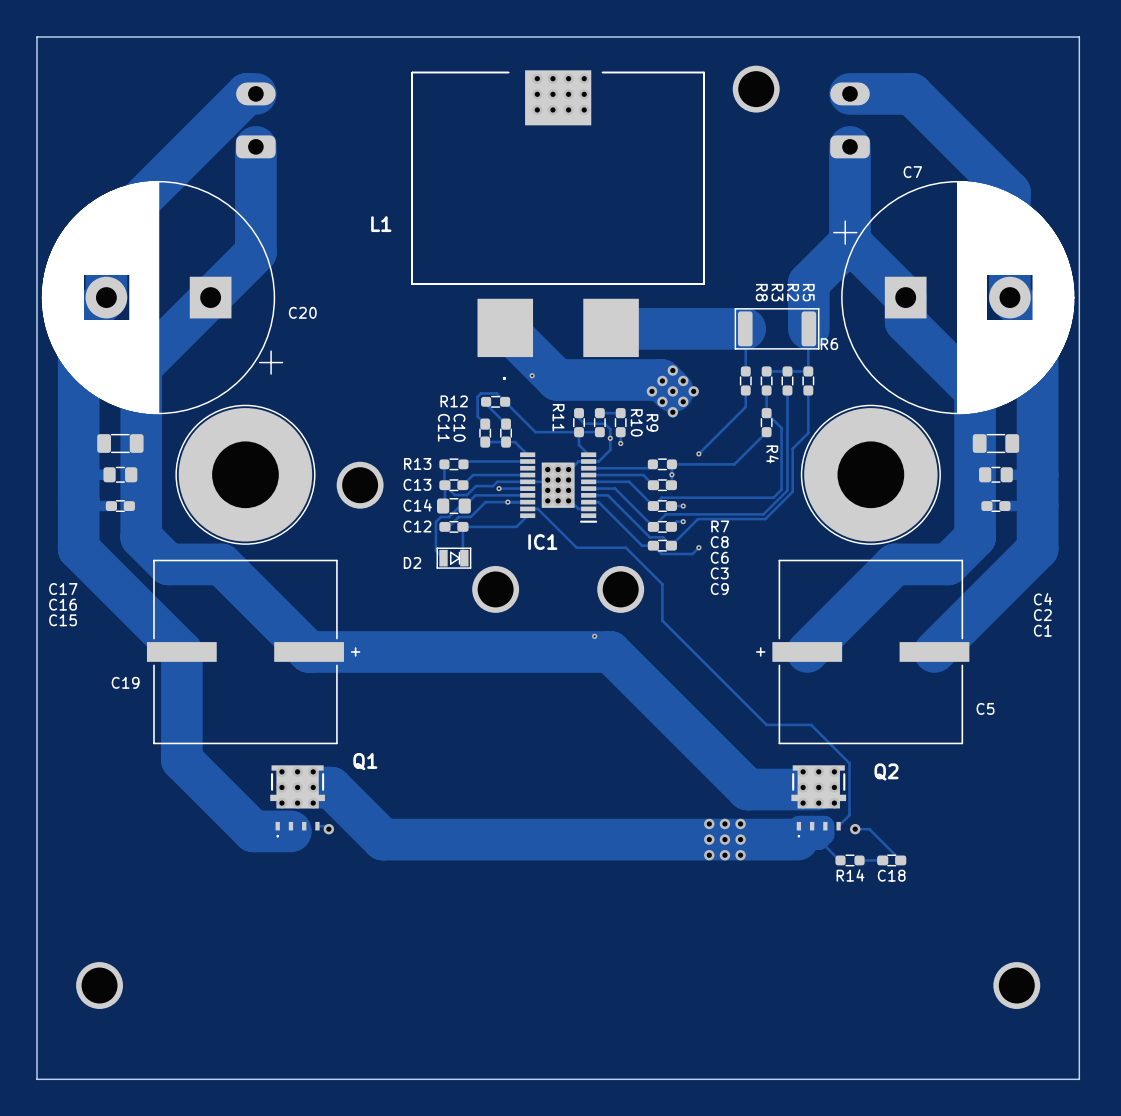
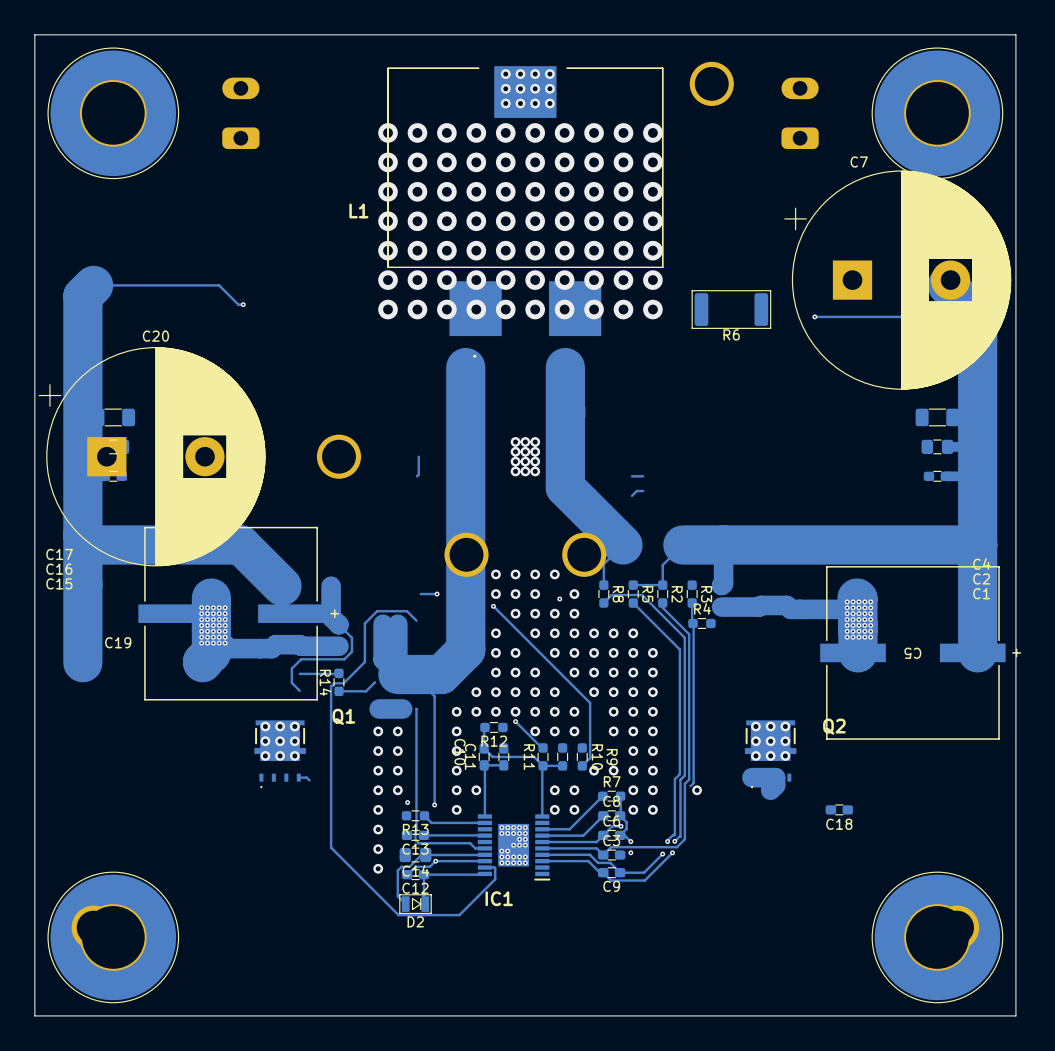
track: (255, 93) (246, 93) (106, 234) (106, 297) (78, 325) (78, 548) (181, 651) (181, 759) (253, 831) (290, 831) -> none
track: (850, 93) (911, 93) (1009, 192) (1009, 297) (1037, 325) (1037, 548) (934, 651) -> none
part: none -> (113, 113)
part: none -> (937, 113)
via: none -> (388, 132)
via: none -> (417, 132)
via: none -> (446, 132)
via: none -> (476, 132)
via: none -> (505, 132)
via: none -> (535, 132)
via: none -> (564, 132)
via: none -> (594, 132)
via: none -> (623, 132)
via: none -> (652, 132)
track: (255, 146) (255, 252) (141, 366) (141, 537) (168, 564) (221, 564) (309, 651) (610, 651) (747, 789) (818, 789) -> none
track: (850, 146) (850, 241) -> none
via: none -> (388, 162)
via: none -> (417, 162)
via: none -> (446, 162)
via: none -> (476, 162)
via: none -> (505, 162)
via: none -> (535, 162)
via: none -> (564, 162)
via: none -> (594, 162)
via: none -> (623, 162)
via: none -> (652, 162)
via: none -> (388, 191)
via: none -> (417, 191)
via: none -> (446, 191)
via: none -> (476, 191)
via: none -> (505, 191)
via: none -> (535, 191)
via: none -> (564, 191)
via: none -> (594, 191)
via: none -> (623, 191)
via: none -> (652, 191)
via: none -> (388, 221)
via: none -> (417, 221)
via: none -> (446, 221)
via: none -> (476, 221)
via: none -> (505, 221)
via: none -> (535, 221)
via: none -> (564, 221)
via: none -> (594, 221)
via: none -> (623, 221)
via: none -> (652, 221)
track: (850, 241) (905, 297) (905, 321) (975, 391) (975, 537) (947, 564) (894, 564) (807, 651) -> none
track: (850, 241) (808, 283) (808, 371) (766, 371) -> none
via: none -> (388, 250)
via: none -> (417, 250)
via: none -> (446, 250)
via: none -> (476, 250)
via: none -> (505, 250)
via: none -> (535, 250)
via: none -> (564, 250)
via: none -> (594, 250)
via: none -> (623, 250)
via: none -> (652, 250)
R8 name position: R8 (761, 292) -> R8 (618, 594)
R3 name position: R3 (777, 292) -> R3 (706, 594)
R2 name position: R2 (793, 292) -> R2 (677, 594)
R5 name position: R5 (808, 292) -> R5 (647, 594)
C20 rotation: 0° (162, 297) -> 180° (152, 456)
C20 position: (162, 297) -> (152, 456)
via: none -> (388, 280)
via: none -> (417, 280)
via: none -> (446, 280)
via: none -> (476, 280)
via: none -> (505, 280)
via: none -> (535, 280)
via: none -> (564, 280)
via: none -> (594, 280)
via: none -> (623, 280)
via: none -> (652, 280)
track: none -> (947, 285) (977, 315) (977, 652)
C20 name position: C20 (302, 312) -> C20 (155, 336)
track: none -> (959, 297) (947, 297) (927, 316) (814, 316)
track: none -> (243, 304) (238, 304) (219, 285) (93, 285) (82, 296) (82, 662)
via: none -> (243, 304)
track: (505, 327) (557, 379) (661, 379) (672, 391) -> none
track: (611, 327) (745, 328) (745, 371) -> none
via: none -> (388, 309)
via: none -> (417, 309)
via: none -> (446, 309)
via: none -> (476, 309)
via: none -> (505, 309)
via: none -> (535, 309)
via: none -> (564, 309)
via: none -> (594, 309)
via: none -> (623, 309)
via: none -> (652, 309)
via: none -> (814, 316)
R6 name position: R6 (829, 344) -> R6 (731, 334)
via: (672, 370) -> none
via: (532, 375) -> none
via: (662, 380) -> none
via: (683, 380) -> none
R8 position: (745, 380) -> (603, 594)
R3 position: (766, 380) -> (692, 594)
R2 position: (787, 380) -> (662, 594)
R5 position: (808, 380) -> (633, 594)
track: none -> (465, 367) (465, 650) (441, 674) (397, 674) (383, 659) (383, 624)
track: none -> (565, 367) (565, 487) (623, 545) (603, 564) (603, 585)
track: (745, 390) (745, 407) (698, 453) -> none
track: (766, 390) (766, 413) (781, 428) (781, 489) (773, 497) (661, 497) (653, 506) (629, 481) (588, 481) -> none
track: (787, 390) (787, 490) (763, 514) (665, 514) (653, 526) (615, 488) (588, 488) -> none
track: (808, 390) (808, 433) (792, 448) (792, 491) (765, 519) (697, 519) (671, 545) (663, 537) (649, 537) (607, 495) (588, 495) -> none
via: (651, 391) -> none
via: (672, 391) -> none
via: (693, 391) -> none
R12 name position: R12 (454, 401) -> R12 (494, 741)
track: (486, 401) (486, 404) (506, 424) -> none
R12 position: (495, 401) -> (493, 727)
via: (662, 401) -> none
via: (683, 401) -> none
via: (672, 412) -> none
track: (579, 413) (579, 418) (584, 423) (604, 423) (610, 429) (610, 450) (598, 461) (578, 461) (558, 481) (558, 488) (578, 508) (588, 508) -> none
track: (620, 413) (599, 413) -> none
R11 name position: R11 (558, 417) -> R11 (529, 757)
R11 position: (579, 422) -> (543, 756)
R10 position: (599, 422) -> (562, 756)
R9 position: (620, 422) -> (582, 756)
R4 rotation: 0° (766, 422) -> 90° clockwise (701, 623)
R4 position: (766, 422) -> (701, 623)
track: (485, 424) (477, 416) (477, 396) (481, 393) (496, 393) (535, 432) (599, 432) -> none
C11 name position: C11 (443, 427) -> C11 (470, 756)
track: (579, 432) (579, 445) (588, 454) -> none
track: (766, 432) (734, 464) (671, 464) (671, 485) -> none
C11 position: (485, 433) -> (484, 756)
C10 position: (506, 433) -> (503, 756)
via: (610, 438) -> none
track: (485, 442) (515, 442) (527, 454) -> none
via: (620, 443) -> none
via: (698, 453) -> none
R4 name position: R4 (772, 454) -> R4 (702, 608)
track: (527, 461) (466, 461) (463, 464) -> none
R13 name position: R13 (417, 463) -> R13 (415, 829)
track: (444, 464) (444, 484) (454, 495) (466, 495) (475, 486) (493, 486) (497, 481) (554, 481) (558, 485) -> none
R13 position: (453, 464) -> (415, 815)
track: (652, 464) (648, 468) (588, 468) -> none
R7 position: (662, 464) -> (611, 796)
part: (245, 474) -> none
via: (671, 474) -> none
part: (870, 474) -> none
track: (527, 475) (473, 475) (462, 485) -> none
track: (588, 475) (643, 475) (653, 485) -> none
C13 name position: C13 (417, 484) -> C13 (415, 849)
C13 position: (453, 485) -> (415, 835)
C8 position: (662, 485) -> (611, 815)
IC1 position: (558, 487) -> (514, 847)
via: (499, 488) -> none
track: (527, 488) (499, 488) -> none
track: (527, 495) (475, 495) (449, 516) (440, 516) (435, 521) (435, 550) (443, 558) -> none
via: (507, 502) -> none
track: (527, 502) (485, 502) (470, 516) (458, 516) (448, 526) (444, 526) -> none
track: (588, 502) (598, 502) (642, 545) (653, 545) (661, 553) (692, 553) (698, 547) -> none
C14 name position: C14 (417, 505) -> C14 (415, 870)
C14 position: (453, 506) -> (415, 855)
C6 position: (662, 506) -> (611, 835)
via: (683, 506) -> none
track: (527, 508) (537, 508) (576, 547) (625, 547) (662, 584) (662, 620) (766, 724) (811, 724) (849, 763) (849, 815) (838, 826) -> none
track: (527, 515) (516, 526) (462, 526) (464, 558) -> none
via: (683, 521) -> none
C12 name position: C12 (417, 526) -> C12 (415, 888)
C12 position: (453, 526) -> (415, 874)
C3 position: (662, 526) -> (611, 855)
R7 name position: R7 (720, 526) -> R7 (612, 781)
C8 name position: C8 (719, 542) -> C8 (611, 801)
C9 position: (662, 545) -> (611, 872)
via: (698, 547) -> none
C6 name position: C6 (719, 557) -> C6 (611, 821)
D2 position: (453, 558) -> (415, 904)
D2 name position: D2 (412, 562) -> D2 (415, 921)
track: none -> (82, 535) (92, 545) (240, 545) (282, 586)
C3 name position: C3 (719, 573) -> C3 (611, 840)
track: none -> (977, 545) (682, 545) (662, 565) (662, 585) (633, 585)
track: none -> (721, 546) (723, 545) (723, 583) (721, 585)
C9 name position: C9 (719, 589) -> C9 (611, 886)
via: none -> (495, 574)
via: none -> (515, 574)
via: none -> (535, 574)
via: none -> (554, 574)
track: none -> (338, 594) (331, 586) (331, 616) (338, 624)
track: none -> (437, 594) (420, 594)
via: none -> (437, 594)
via: none -> (495, 594)
via: none -> (515, 594)
via: none -> (535, 594)
via: none -> (574, 594)
track: none -> (211, 597) (211, 652) (202, 662)
via: none -> (847, 601)
via: none -> (853, 601)
via: none -> (858, 601)
via: none -> (864, 601)
via: none -> (870, 601)
track: none -> (633, 603) (679, 649) (679, 774) (674, 779) (674, 835) (667, 841)
track: none -> (662, 603) (662, 607) (689, 634) (689, 779) (684, 783) (684, 839) (676, 847) (611, 847) (603, 855) (596, 848) (542, 848)
track: none -> (692, 603) (693, 783) (690, 786)
track: none -> (603, 604) (611, 595) (642, 595) (684, 637) (684, 775) (680, 779) (680, 836) (674, 841)
track: none -> (493, 606) (590, 702) (590, 758) (582, 765)
via: none -> (493, 606)
track: none -> (721, 607) (786, 605) (790, 609) (845, 609) (856, 597) (857, 652)
via: none -> (201, 607)
via: none -> (207, 607)
via: none -> (213, 607)
via: none -> (219, 607)
via: none -> (225, 607)
via: none -> (847, 607)
via: none -> (853, 607)
via: none -> (858, 607)
via: none -> (864, 607)
via: none -> (870, 607)
via: none -> (201, 613)
via: none -> (207, 613)
via: none -> (213, 613)
via: none -> (219, 613)
via: none -> (225, 613)
via: none -> (515, 613)
via: none -> (535, 613)
via: none -> (554, 613)
via: none -> (574, 613)
C5 rotation: 0° (862, 651) -> 180° (920, 652)
via: none -> (847, 613)
via: none -> (853, 613)
via: none -> (858, 613)
via: none -> (864, 613)
via: none -> (870, 613)
via: none -> (201, 619)
via: none -> (207, 619)
via: none -> (213, 619)
via: none -> (219, 619)
via: none -> (225, 619)
via: none -> (847, 619)
via: none -> (853, 619)
via: none -> (858, 619)
via: none -> (864, 619)
via: none -> (870, 619)
track: none -> (416, 620) (407, 611) (377, 611) (364, 623) (364, 662) (343, 683) (334, 683) (331, 686) (331, 847) (398, 915) (459, 915) (495, 879) (495, 868) (484, 867)
track: none -> (338, 624) (351, 637) (351, 651) (344, 659) (301, 659) (291, 668) (291, 682) (299, 690)
track: none -> (397, 624) (397, 654)
via: none -> (201, 625)
via: none -> (207, 625)
via: none -> (213, 625)
via: none -> (219, 625)
via: none -> (225, 625)
via: none -> (847, 625)
via: none -> (853, 625)
via: none -> (858, 625)
via: none -> (864, 625)
via: none -> (870, 625)
via: none -> (201, 631)
via: none -> (207, 631)
track: none -> (211, 630) (229, 648) (271, 648) (275, 644) (338, 646)
via: none -> (213, 631)
via: none -> (219, 631)
via: none -> (225, 631)
via: none -> (847, 631)
via: none -> (853, 631)
via: none -> (858, 631)
via: none -> (864, 631)
via: none -> (870, 631)
via: none -> (495, 633)
via: none -> (535, 633)
via: none -> (554, 633)
via: none -> (574, 633)
via: none -> (594, 633)
via: none -> (613, 633)
via: none -> (633, 633)
via: none -> (201, 637)
via: none -> (207, 637)
via: none -> (213, 637)
via: none -> (219, 637)
via: none -> (225, 637)
via: none -> (847, 637)
via: none -> (853, 637)
via: none -> (858, 637)
via: none -> (864, 637)
via: none -> (870, 637)
via: none -> (201, 643)
via: none -> (207, 643)
via: none -> (213, 643)
via: none -> (219, 643)
via: none -> (225, 643)
via: none -> (495, 652)
via: none -> (515, 652)
via: none -> (554, 652)
via: none -> (574, 652)
via: none -> (594, 652)
via: none -> (613, 652)
via: none -> (633, 652)
via: none -> (652, 652)
C5 name position: C5 (985, 708) -> C5 (912, 653)
via: none -> (495, 672)
via: none -> (515, 672)
via: none -> (535, 672)
via: none -> (574, 672)
via: none -> (594, 672)
via: none -> (613, 672)
via: none -> (633, 672)
via: none -> (652, 672)
track: none -> (338, 673) (299, 673)
track: none -> (374, 682) (366, 691) (338, 691)
track: none -> (420, 682) (434, 696) (434, 804)
via: none -> (476, 692)
via: none -> (495, 692)
via: none -> (515, 692)
via: none -> (535, 692)
via: none -> (554, 692)
via: none -> (594, 692)
via: none -> (613, 692)
via: none -> (633, 692)
via: none -> (652, 692)
track: none -> (402, 708) (379, 708)
track: none -> (416, 709) (415, 840) (418, 843) (470, 843) (475, 848) (484, 848)
via: none -> (456, 711)
via: none -> (476, 711)
via: none -> (495, 711)
via: none -> (515, 711)
via: none -> (535, 711)
via: none -> (554, 711)
via: none -> (574, 711)
via: none -> (613, 711)
via: none -> (633, 711)
via: none -> (652, 711)
track: none -> (515, 721) (543, 747)
via: none -> (515, 721)
track: none -> (485, 727) (484, 748) (492, 756) (534, 756) (543, 765)
via: none -> (378, 731)
via: none -> (397, 731)
via: none -> (456, 731)
via: none -> (535, 731)
via: none -> (554, 731)
via: none -> (574, 731)
via: none -> (613, 731)
via: none -> (633, 731)
via: none -> (652, 731)
track: (297, 787) (331, 787) (383, 839) (818, 839) (840, 860) -> none
via: none -> (378, 751)
via: none -> (397, 751)
via: none -> (456, 751)
via: none -> (633, 751)
via: none -> (652, 751)
track: none -> (503, 765) (484, 765) (484, 816)
track: none -> (543, 765) (542, 816)
track: none -> (562, 765) (543, 765)
via: none -> (378, 770)
via: none -> (397, 770)
via: none -> (456, 770)
via: none -> (594, 770)
via: none -> (613, 770)
via: none -> (633, 770)
via: none -> (652, 770)
via: (709, 823) -> none
via: (724, 823) -> none
via: (740, 823) -> none
via: (328, 829) -> none
track: (855, 829) (869, 829) (900, 860) -> none
via: (855, 829) -> none
via: none -> (378, 790)
via: none -> (397, 790)
via: none -> (456, 790)
via: none -> (476, 790)
via: none -> (554, 790)
via: none -> (574, 790)
via: none -> (633, 790)
via: none -> (652, 790)
via: (709, 839) -> none
via: (724, 839) -> none
track: none -> (602, 796) (569, 829) (542, 829)
track: none -> (620, 796) (620, 815) (626, 822) (626, 828) (620, 835) (624, 835) (630, 841)
via: none -> (407, 802)
via: none -> (434, 804)
via: (709, 855) -> none
via: (724, 855) -> none
via: (740, 855) -> none
via: none -> (378, 809)
via: none -> (456, 809)
via: none -> (554, 809)
via: none -> (574, 809)
via: none -> (633, 809)
via: none -> (652, 809)
R14 rotation: 0° (850, 860) -> 90° clockwise (338, 682)
R14 position: (850, 860) -> (338, 682)
track: (882, 860) (859, 860) -> none
track: none -> (424, 815) (431, 822) (484, 822)
track: none -> (603, 815) (583, 835) (542, 835)
track: none -> (621, 826) (612, 826) (596, 842) (542, 842)
via: none -> (621, 826)
via: none -> (501, 827)
via: none -> (507, 827)
via: none -> (513, 827)
via: none -> (519, 827)
via: none -> (525, 827)
via: none -> (378, 829)
via: none -> (501, 833)
via: none -> (507, 833)
via: none -> (513, 833)
via: none -> (519, 833)
via: none -> (525, 833)
track: none -> (423, 835) (484, 835)
via: none -> (519, 839)
via: none -> (525, 839)
via: none -> (674, 841)
via: none -> (630, 841)
via: none -> (667, 841)
via: none -> (513, 845)
via: none -> (519, 845)
via: none -> (525, 845)
via: none -> (378, 849)
via: none -> (501, 851)
via: none -> (507, 851)
via: none -> (630, 852)
track: none -> (672, 852) (644, 880) (611, 880) (588, 861) (542, 861)
via: none -> (672, 852)
track: none -> (662, 854) (644, 872) (620, 872) (610, 862) (597, 862) (589, 854) (542, 854)
via: none -> (662, 854)
track: none -> (484, 854) (421, 855) (409, 866) (401, 866) (397, 870) (397, 896) (405, 904)
via: none -> (501, 856)
via: none -> (507, 856)
via: none -> (513, 856)
via: none -> (519, 856)
via: none -> (525, 856)
via: none -> (435, 861)
track: none -> (484, 861) (435, 861) (429, 866) (415, 866) (407, 874)
via: none -> (501, 862)
via: none -> (507, 862)
via: none -> (513, 862)
via: none -> (519, 862)
via: none -> (525, 862)
via: none -> (378, 868)
track: none -> (484, 873) (423, 874) (425, 904)
part: none -> (113, 937)
part: none -> (937, 937)

